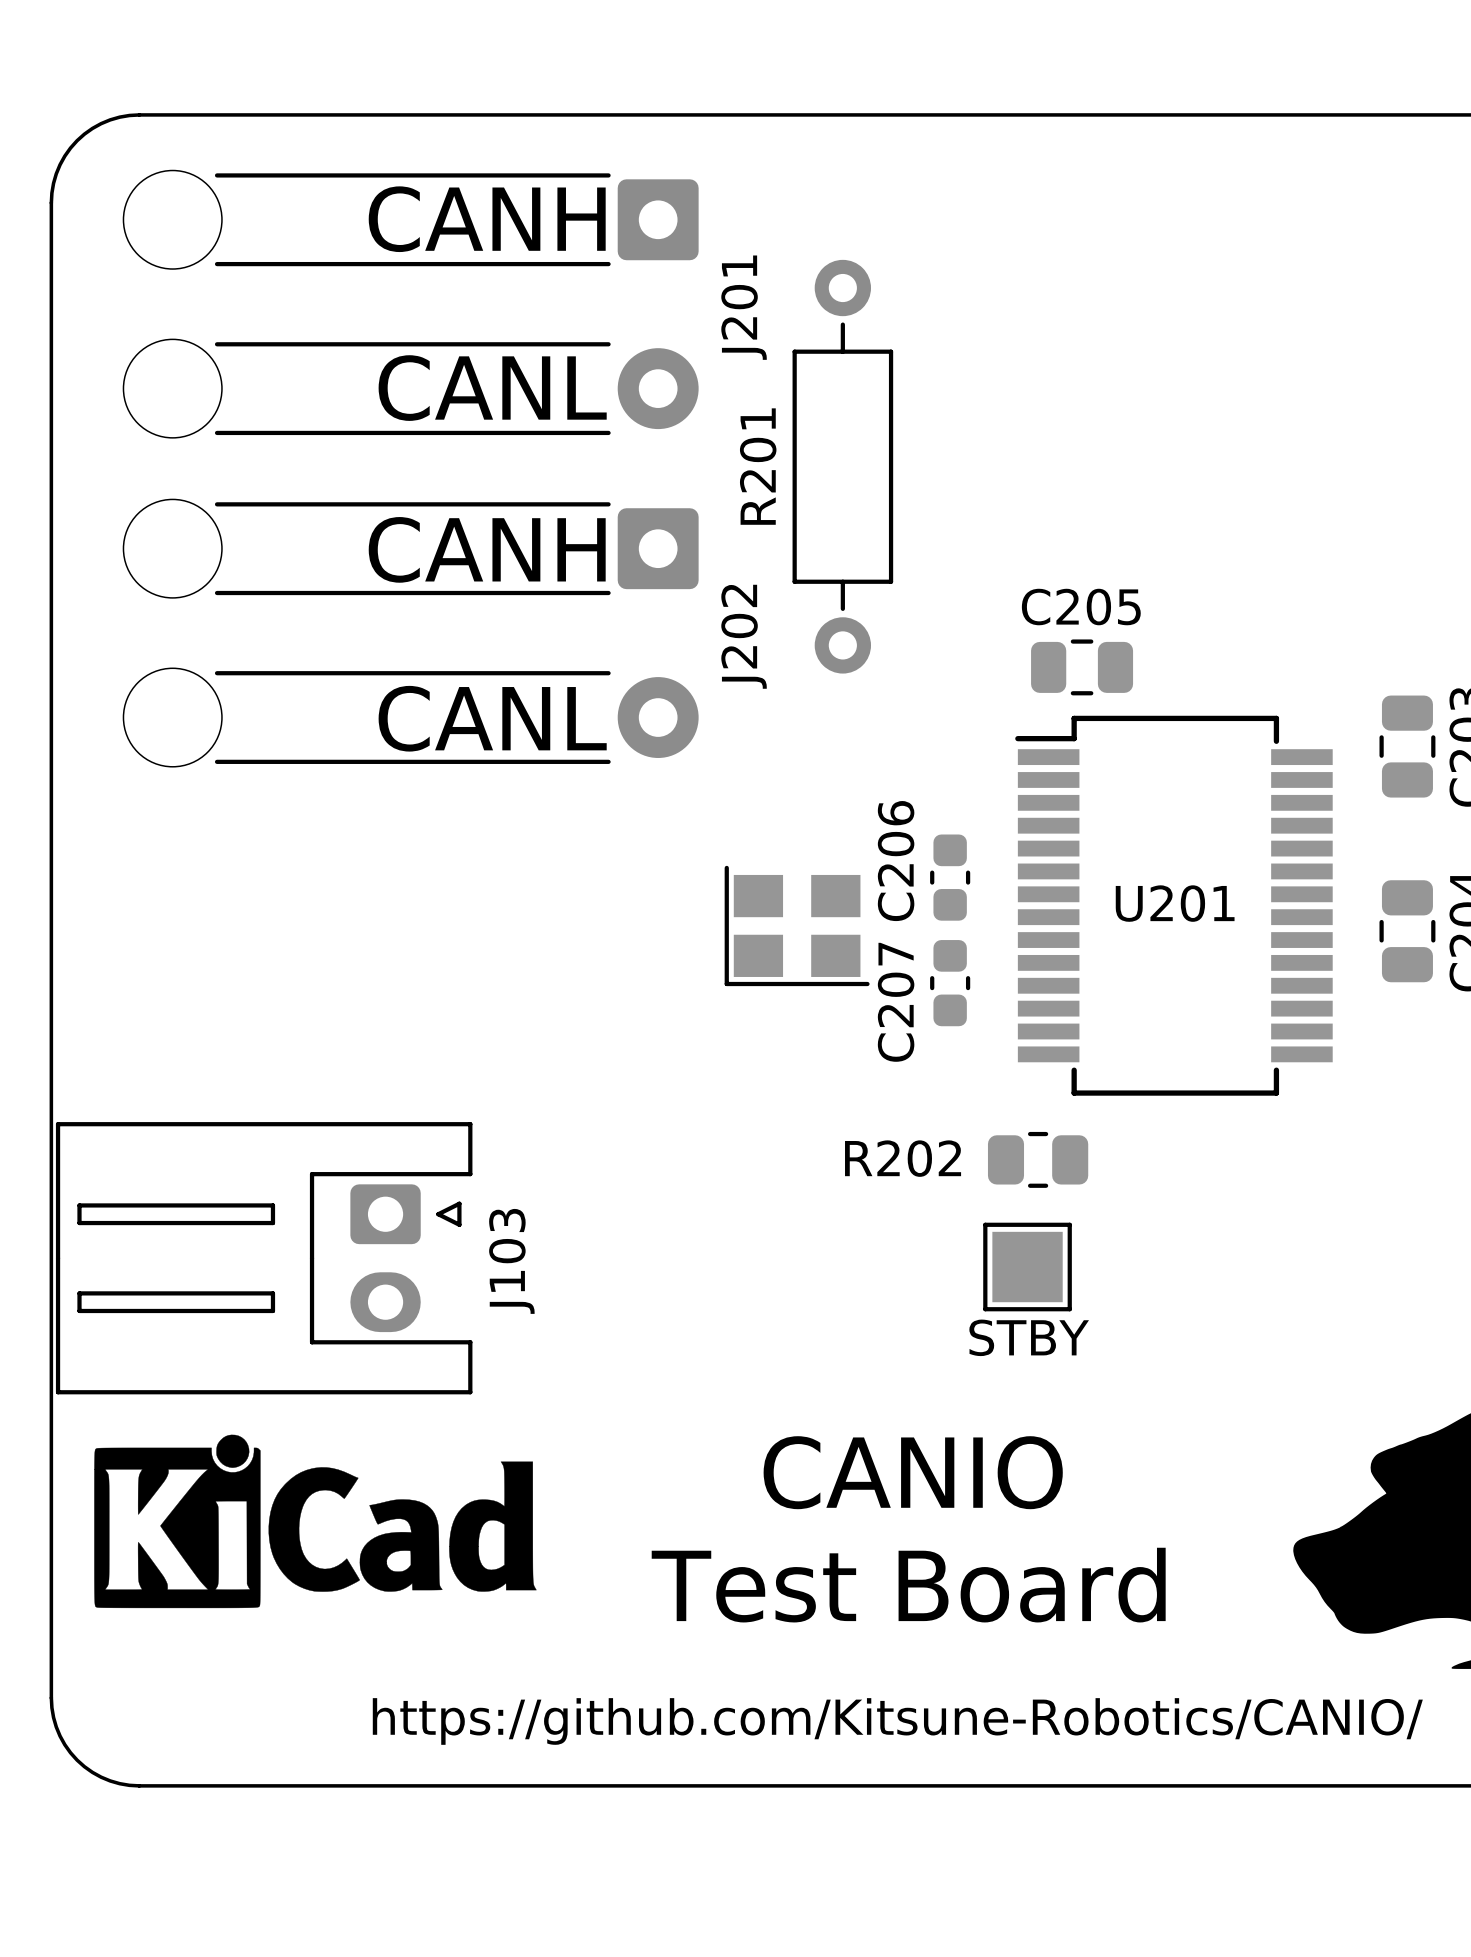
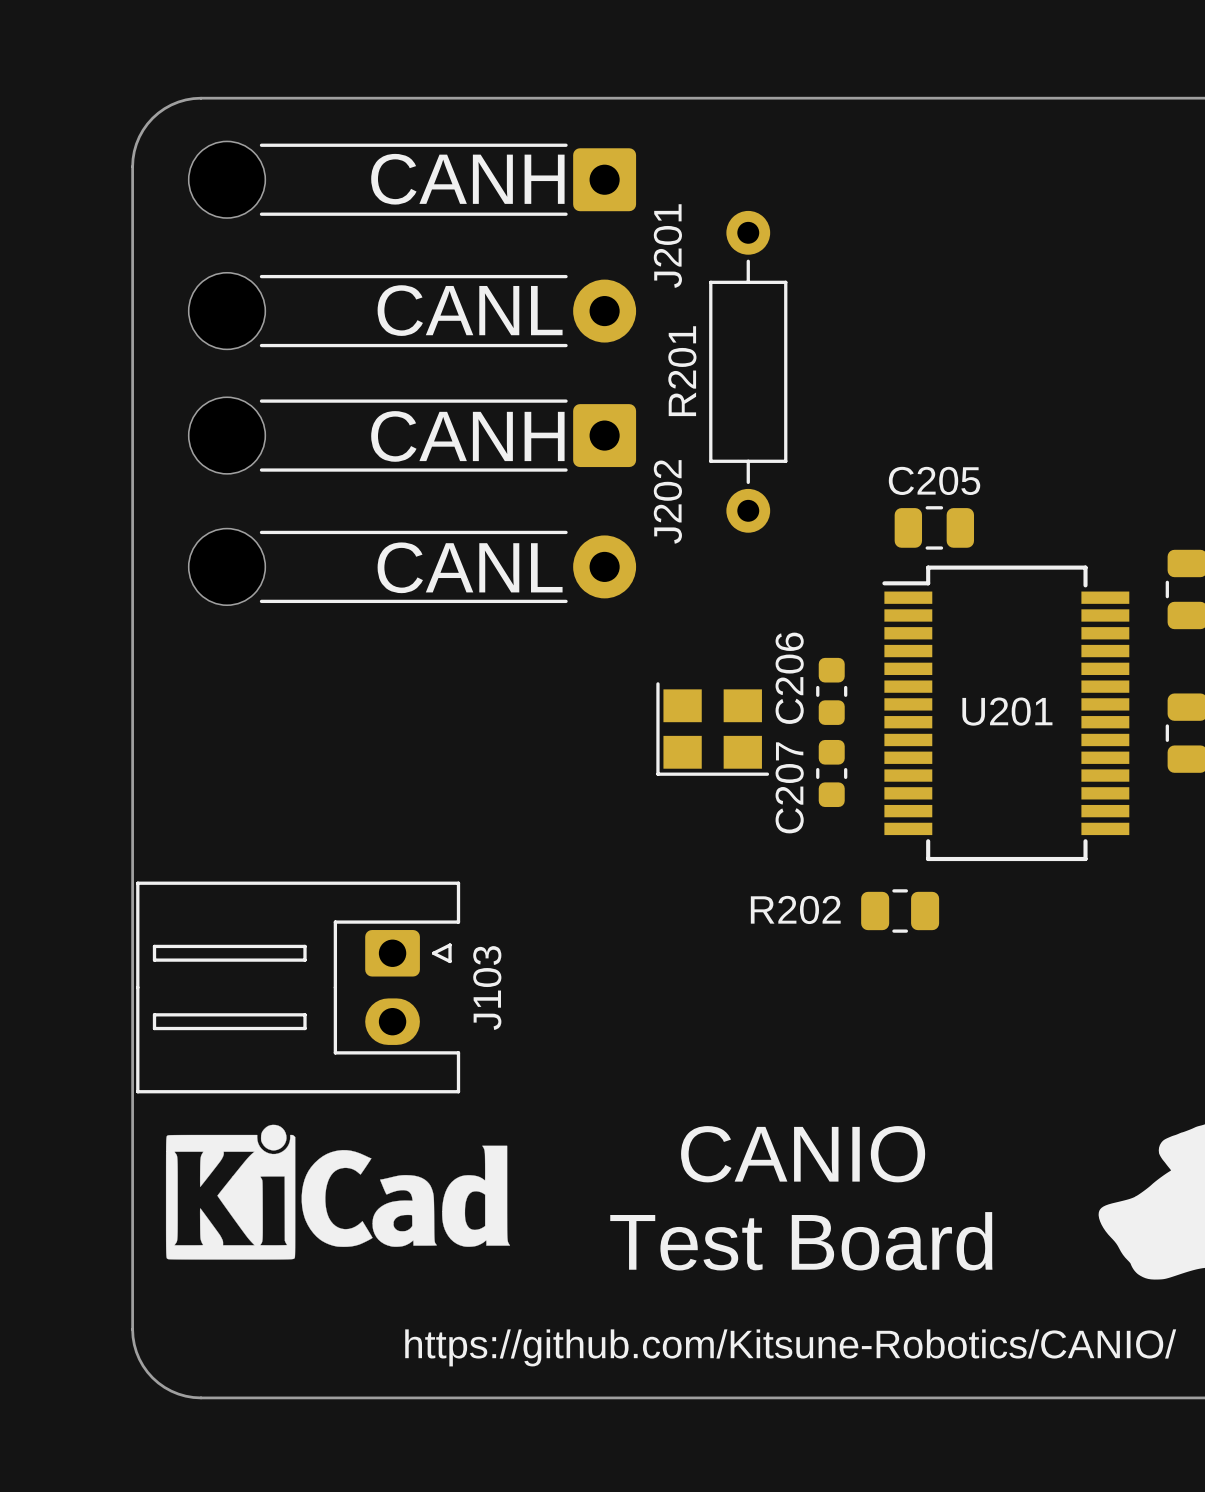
part: STBY (1027, 1267) -> none

